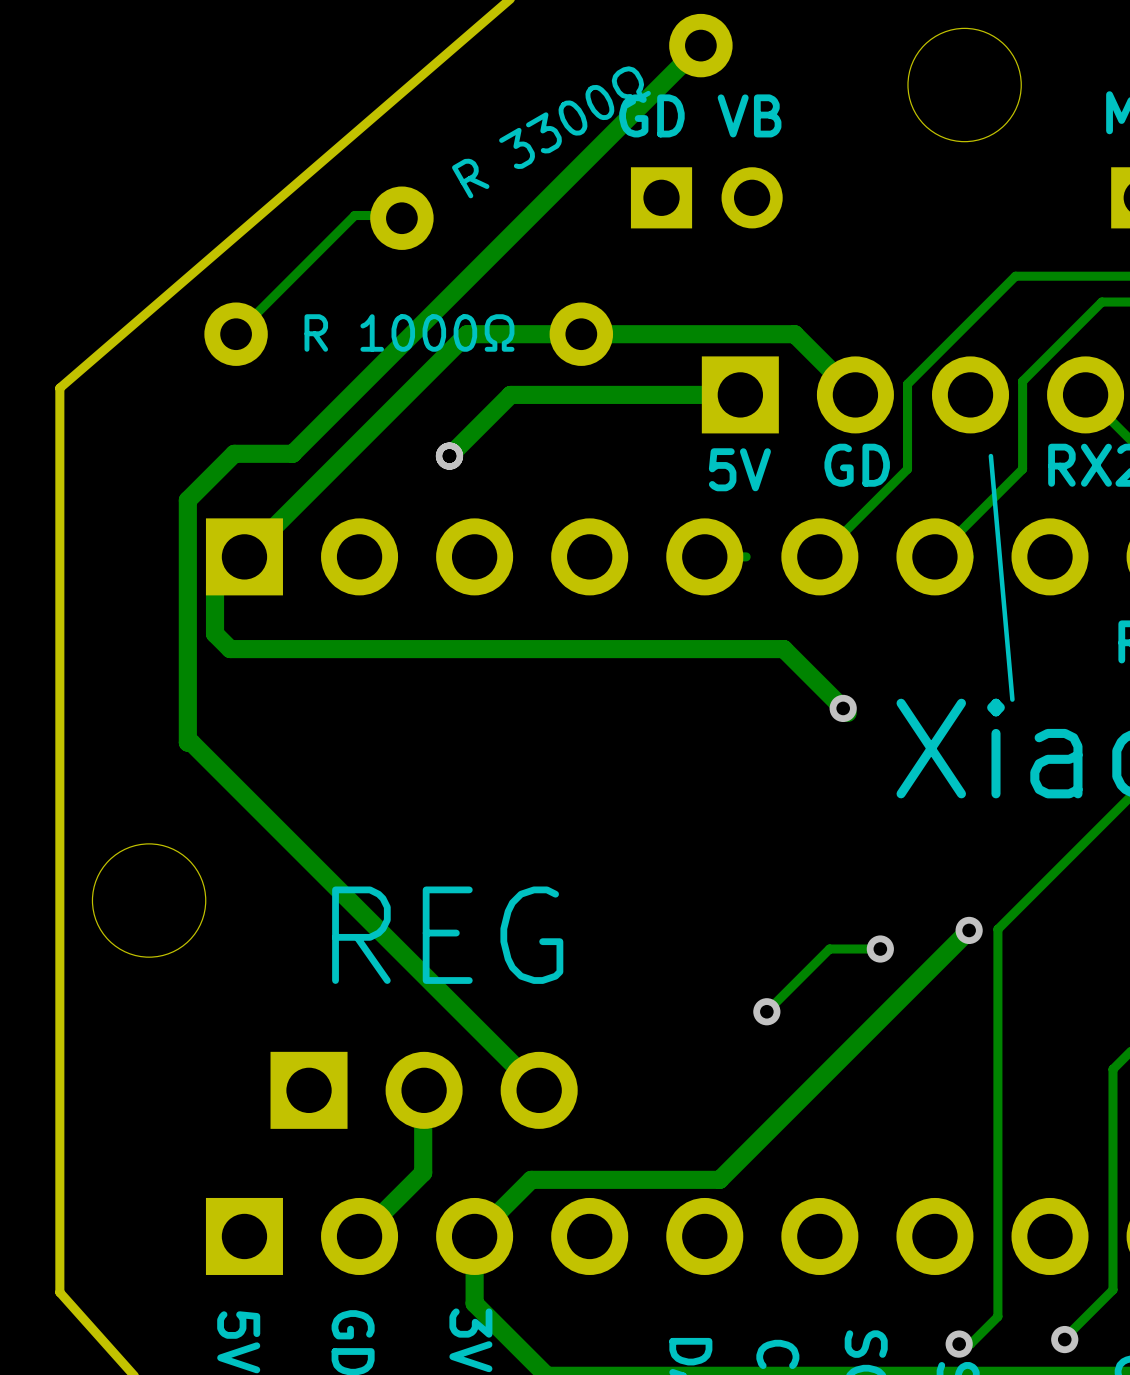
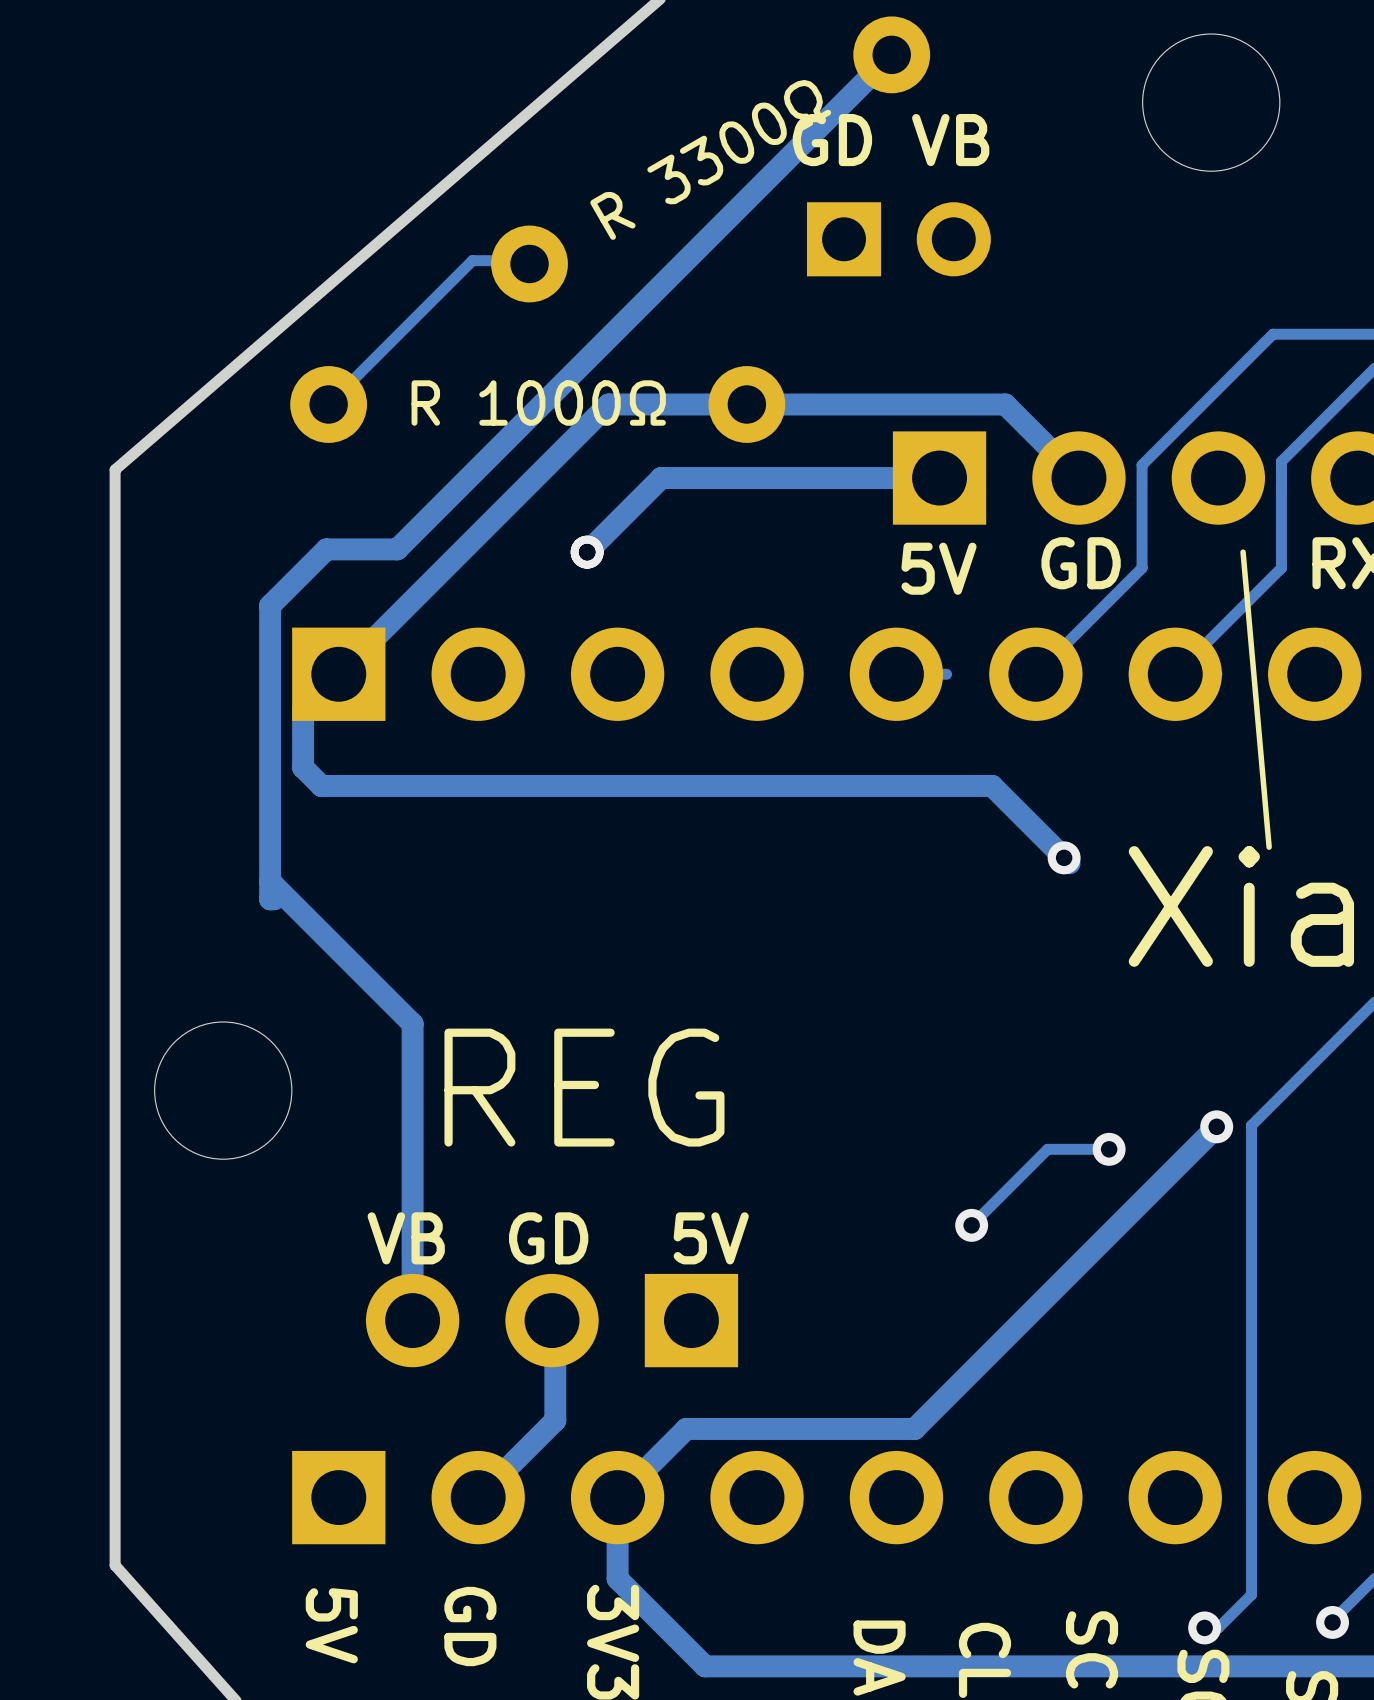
track: none -> (270, 881) (412, 1023) (412, 1320)
track: (191, 742) (539, 1090) -> none
text position: REG (447, 935) -> REG (584, 1087)
text: none -> VB (406, 1238)
text: none -> GD (548, 1238)
text: none -> 5V (711, 1238)
part rotation: 0° (424, 1090) -> 180° (552, 1320)

